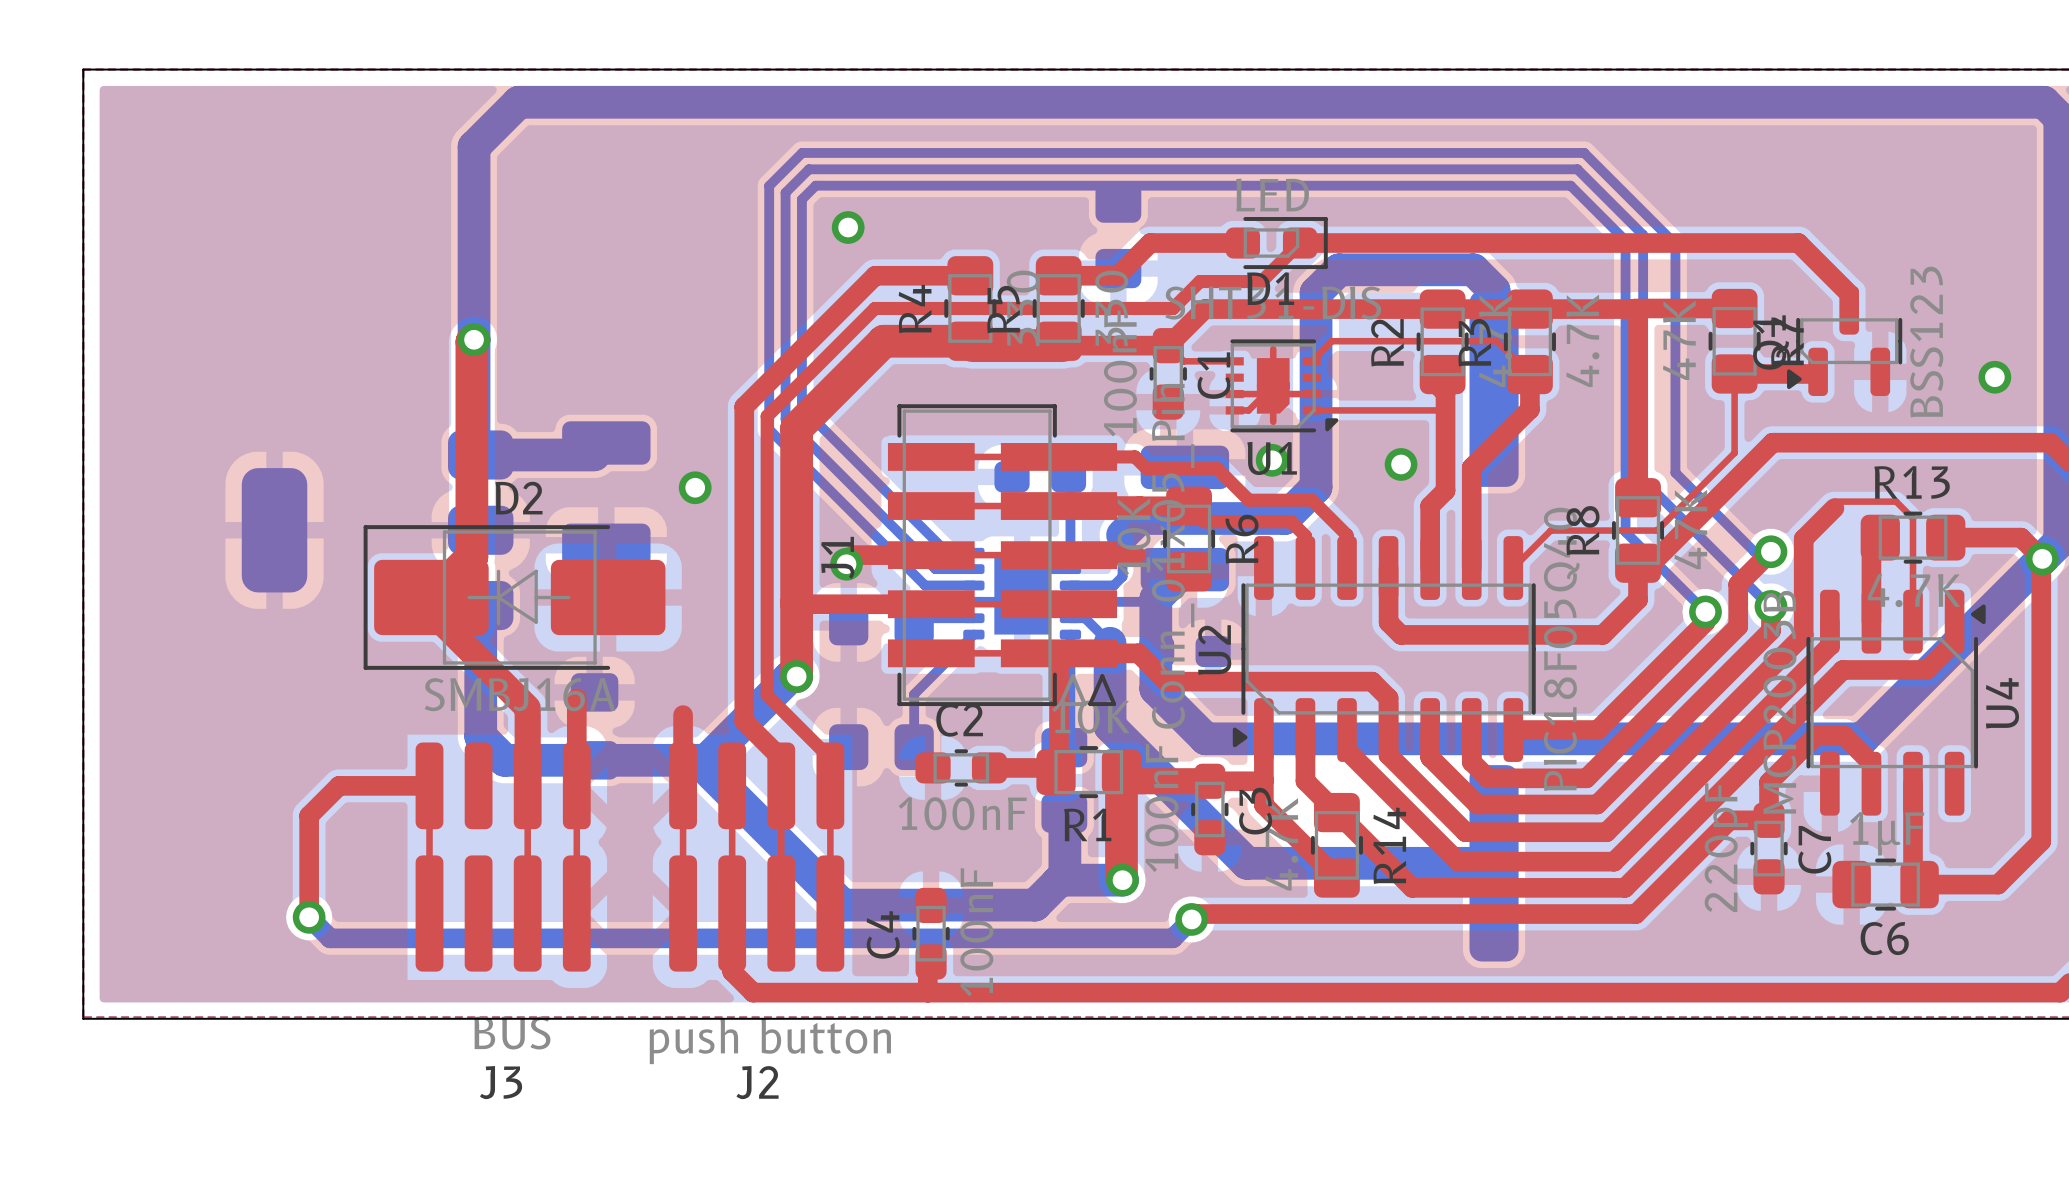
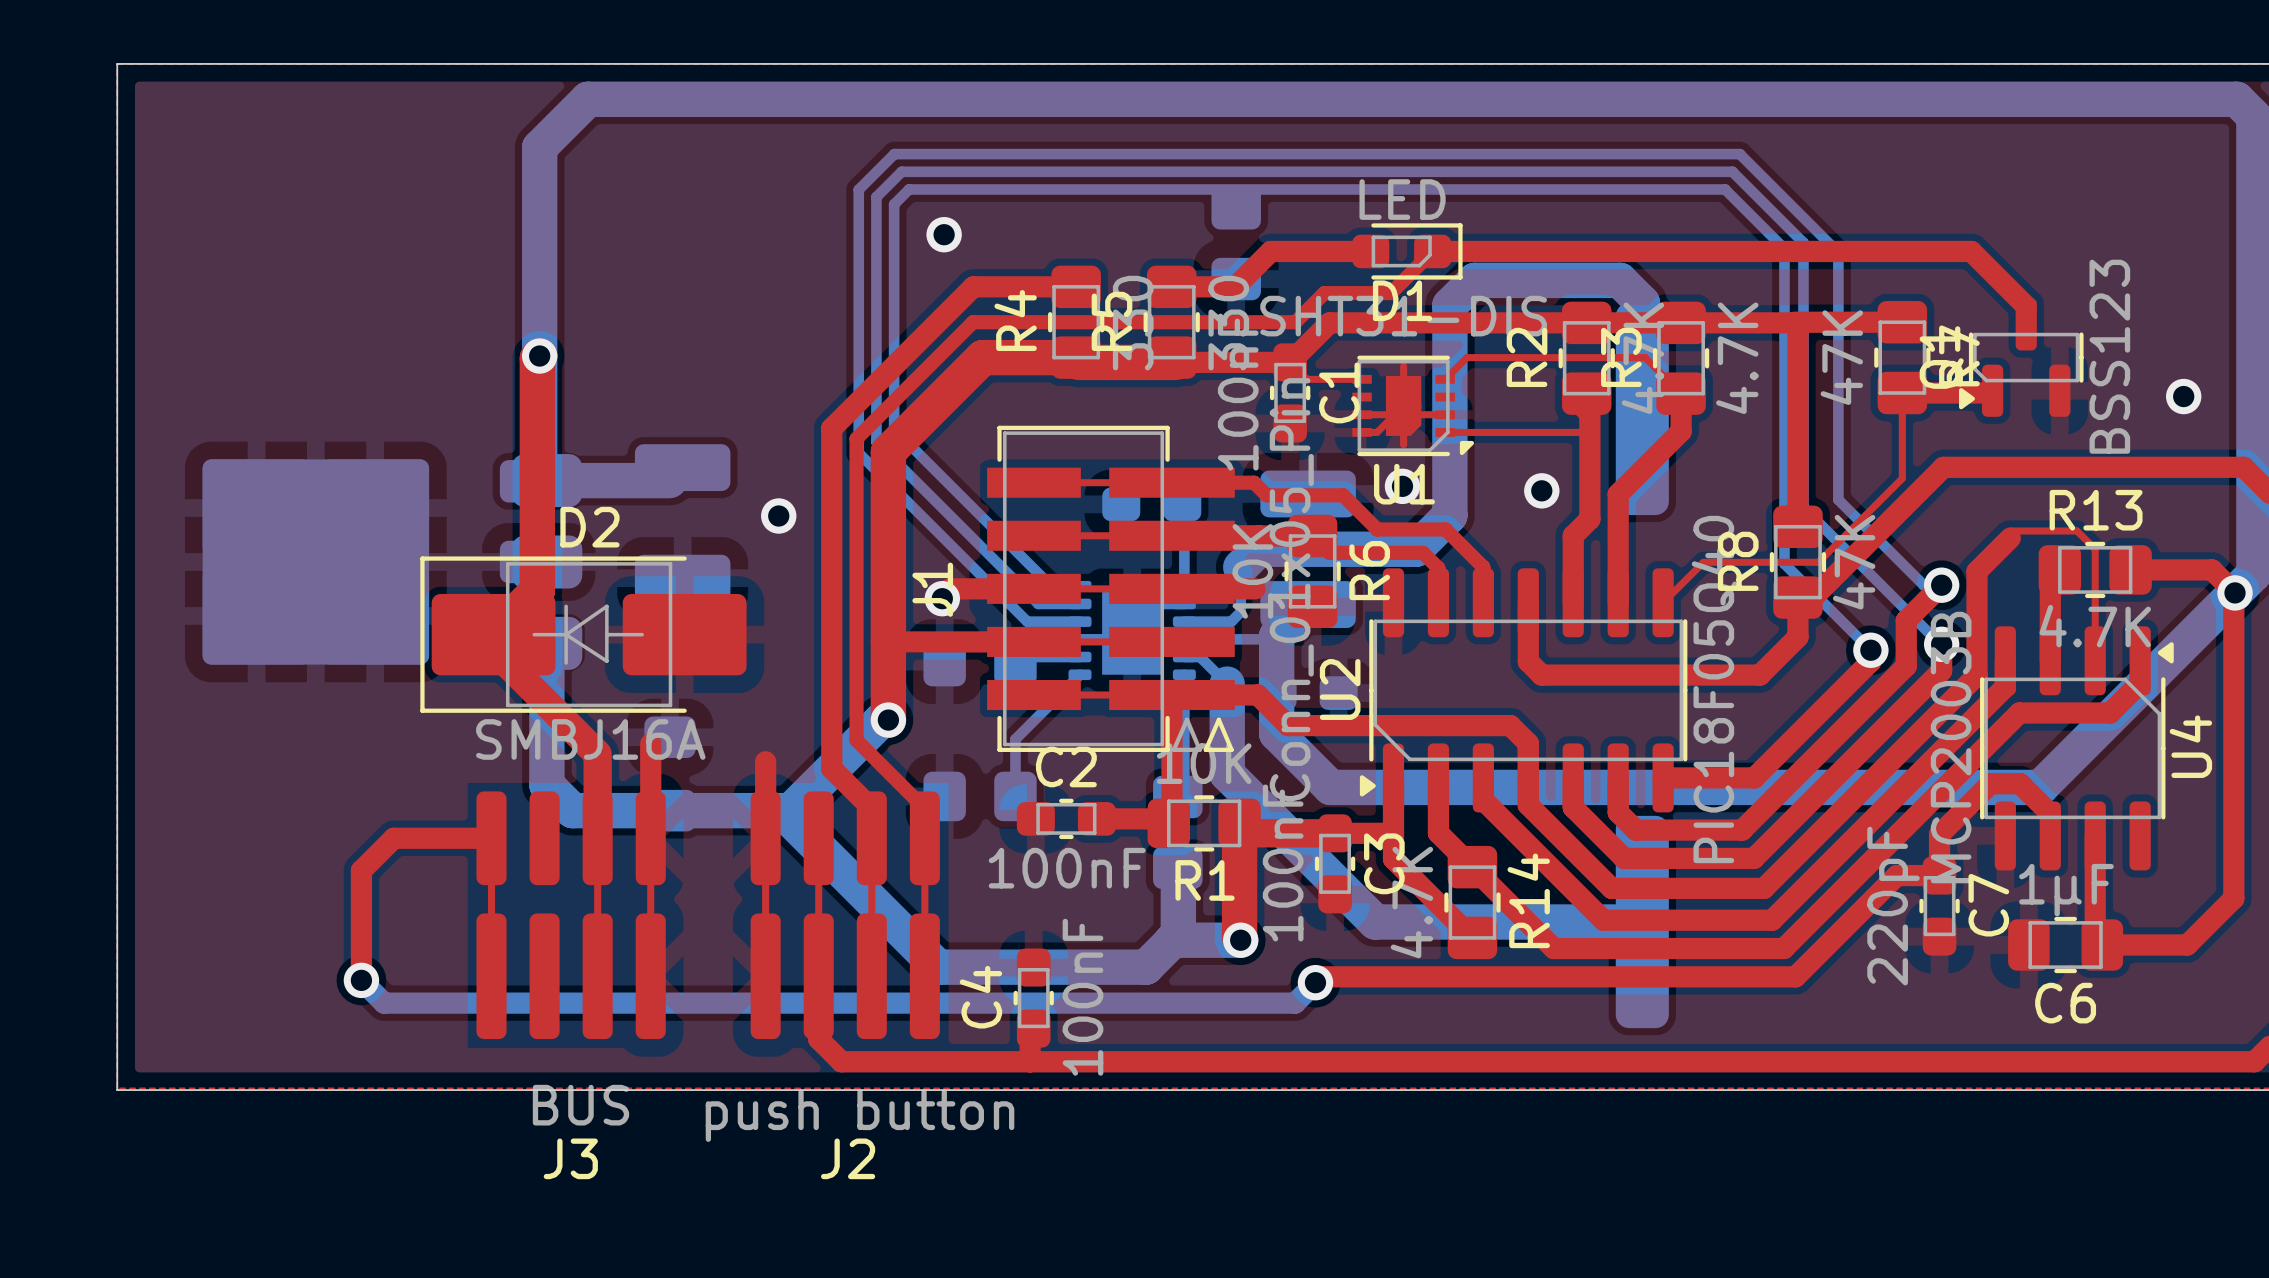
part: none -> (390, 561)

